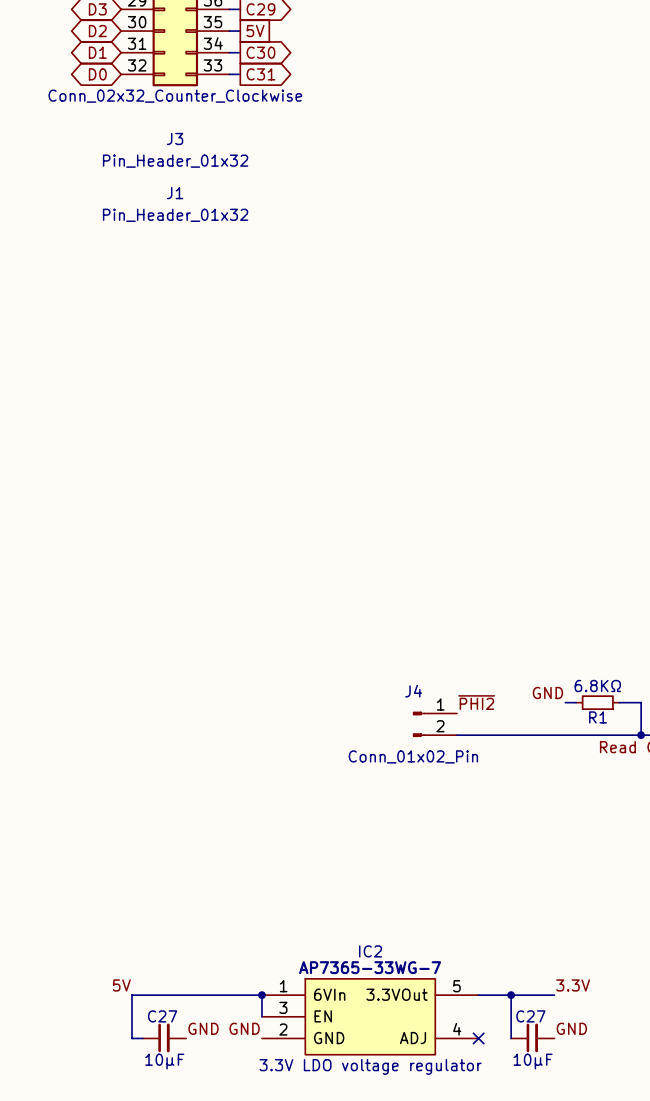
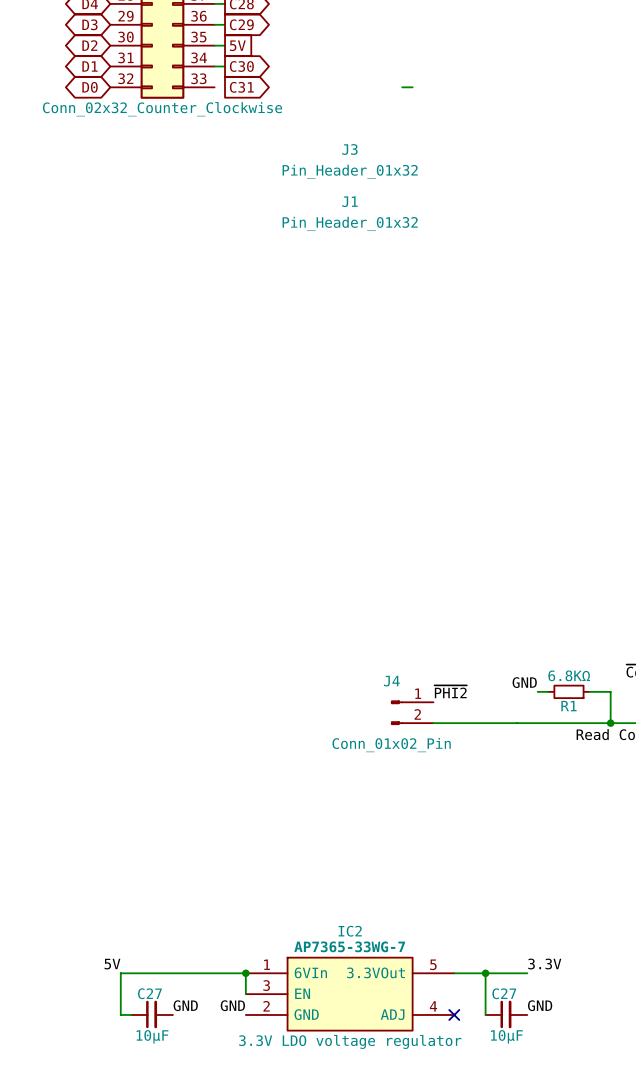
wire: (229, 74) (240, 74) -> (402, 87) (412, 87)
J3 position: (175, 150) -> (350, 161)
J1 position: (175, 204) -> (350, 213)

